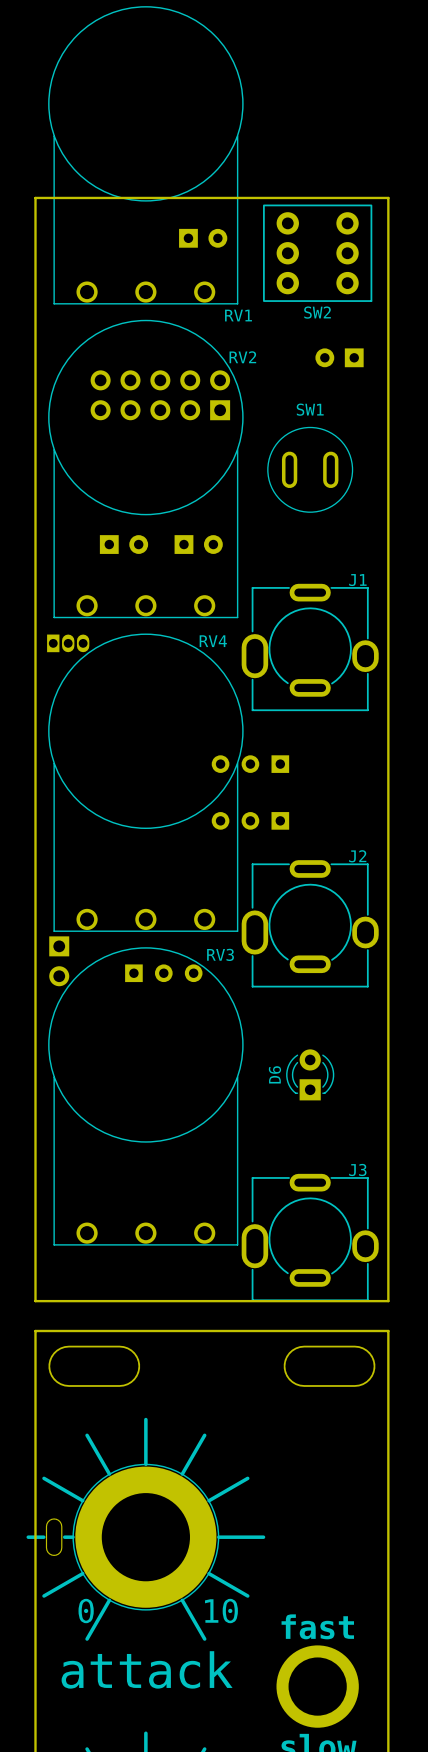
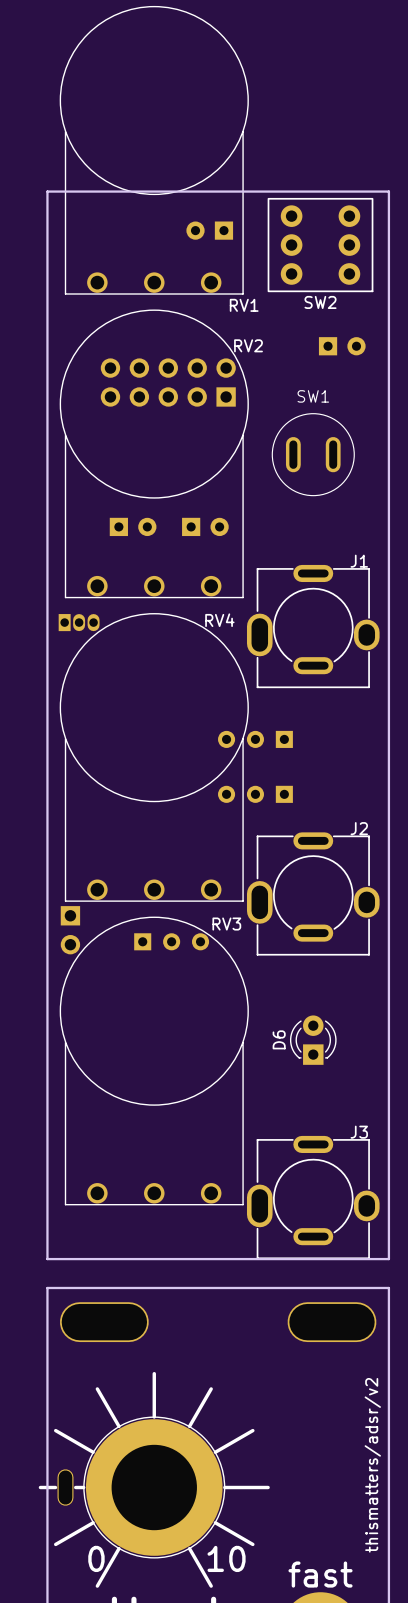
part rotation: 0° (203, 238) -> 180° (209, 230)
part rotation: 0° (339, 357) -> 180° (342, 346)
text: none -> thismatters/adsr/v2 (372, 1465)

